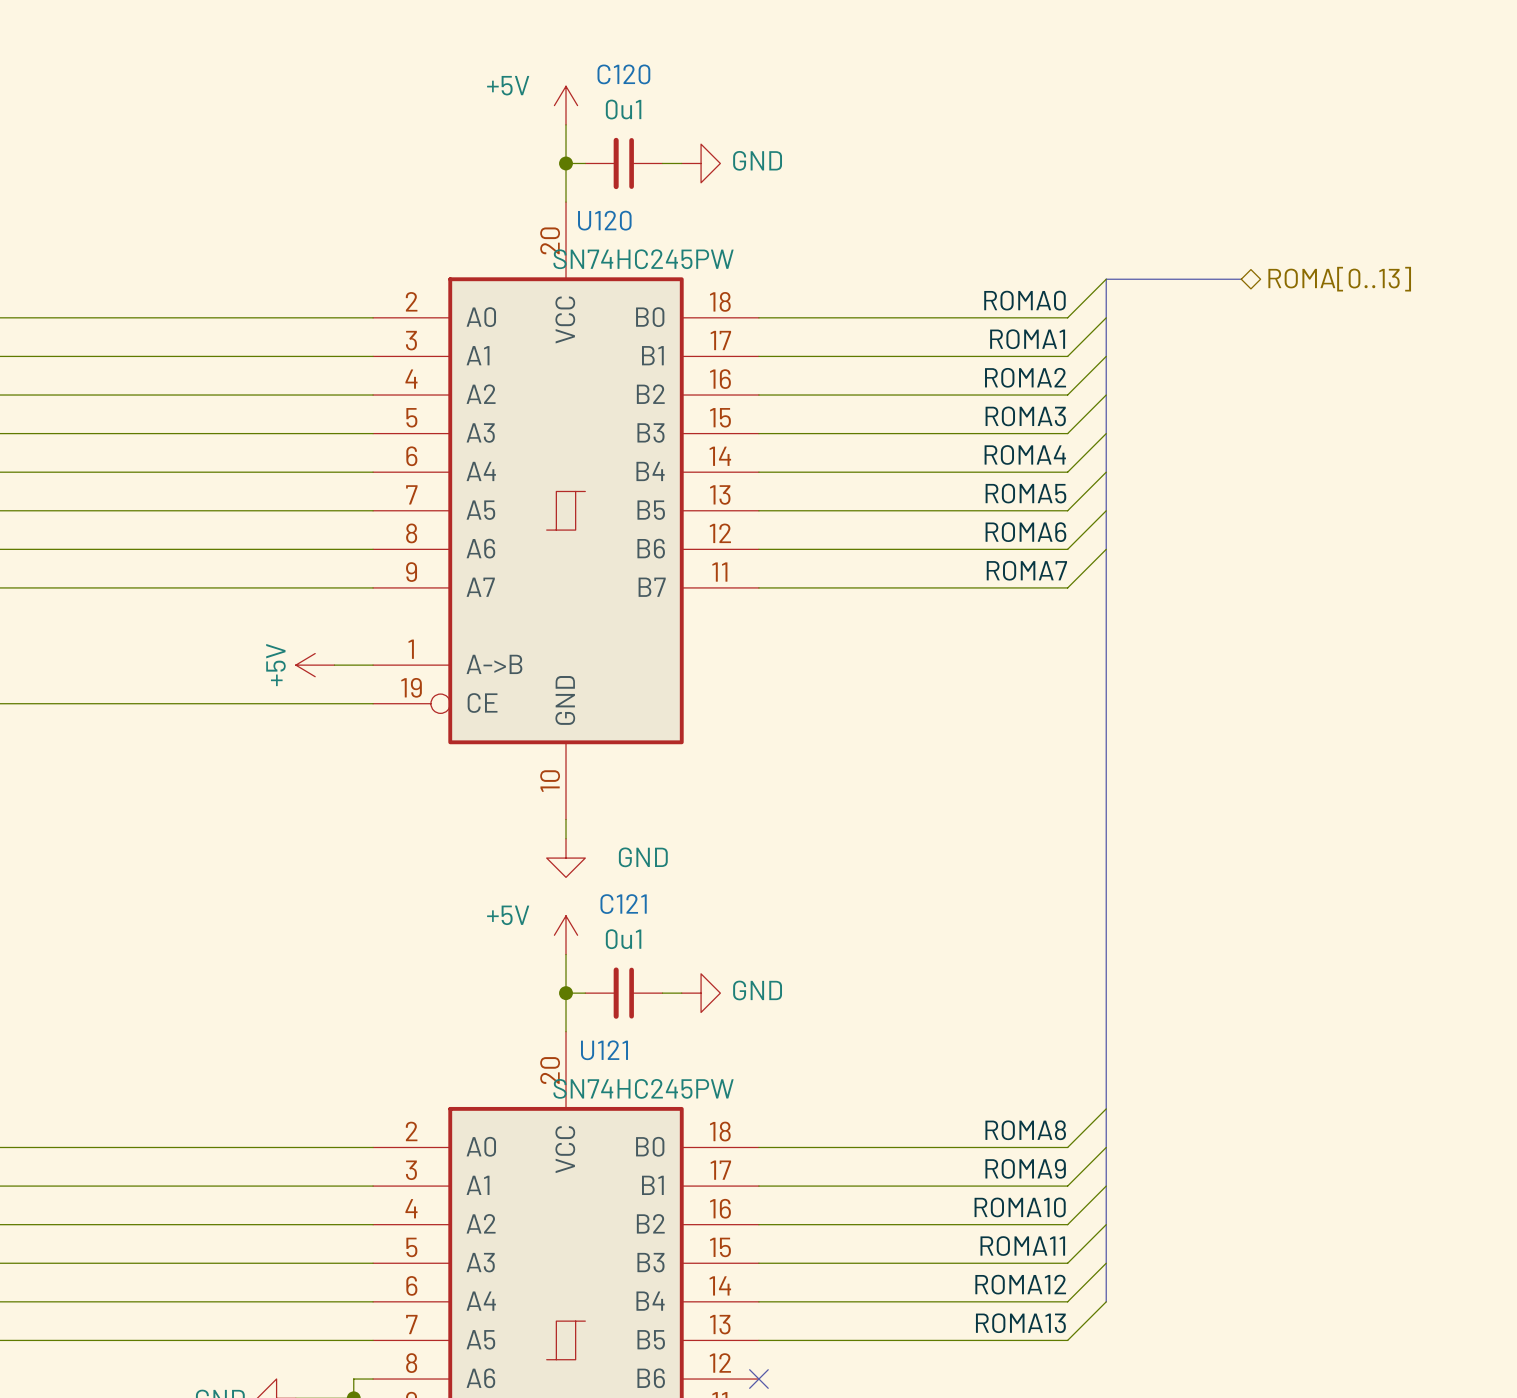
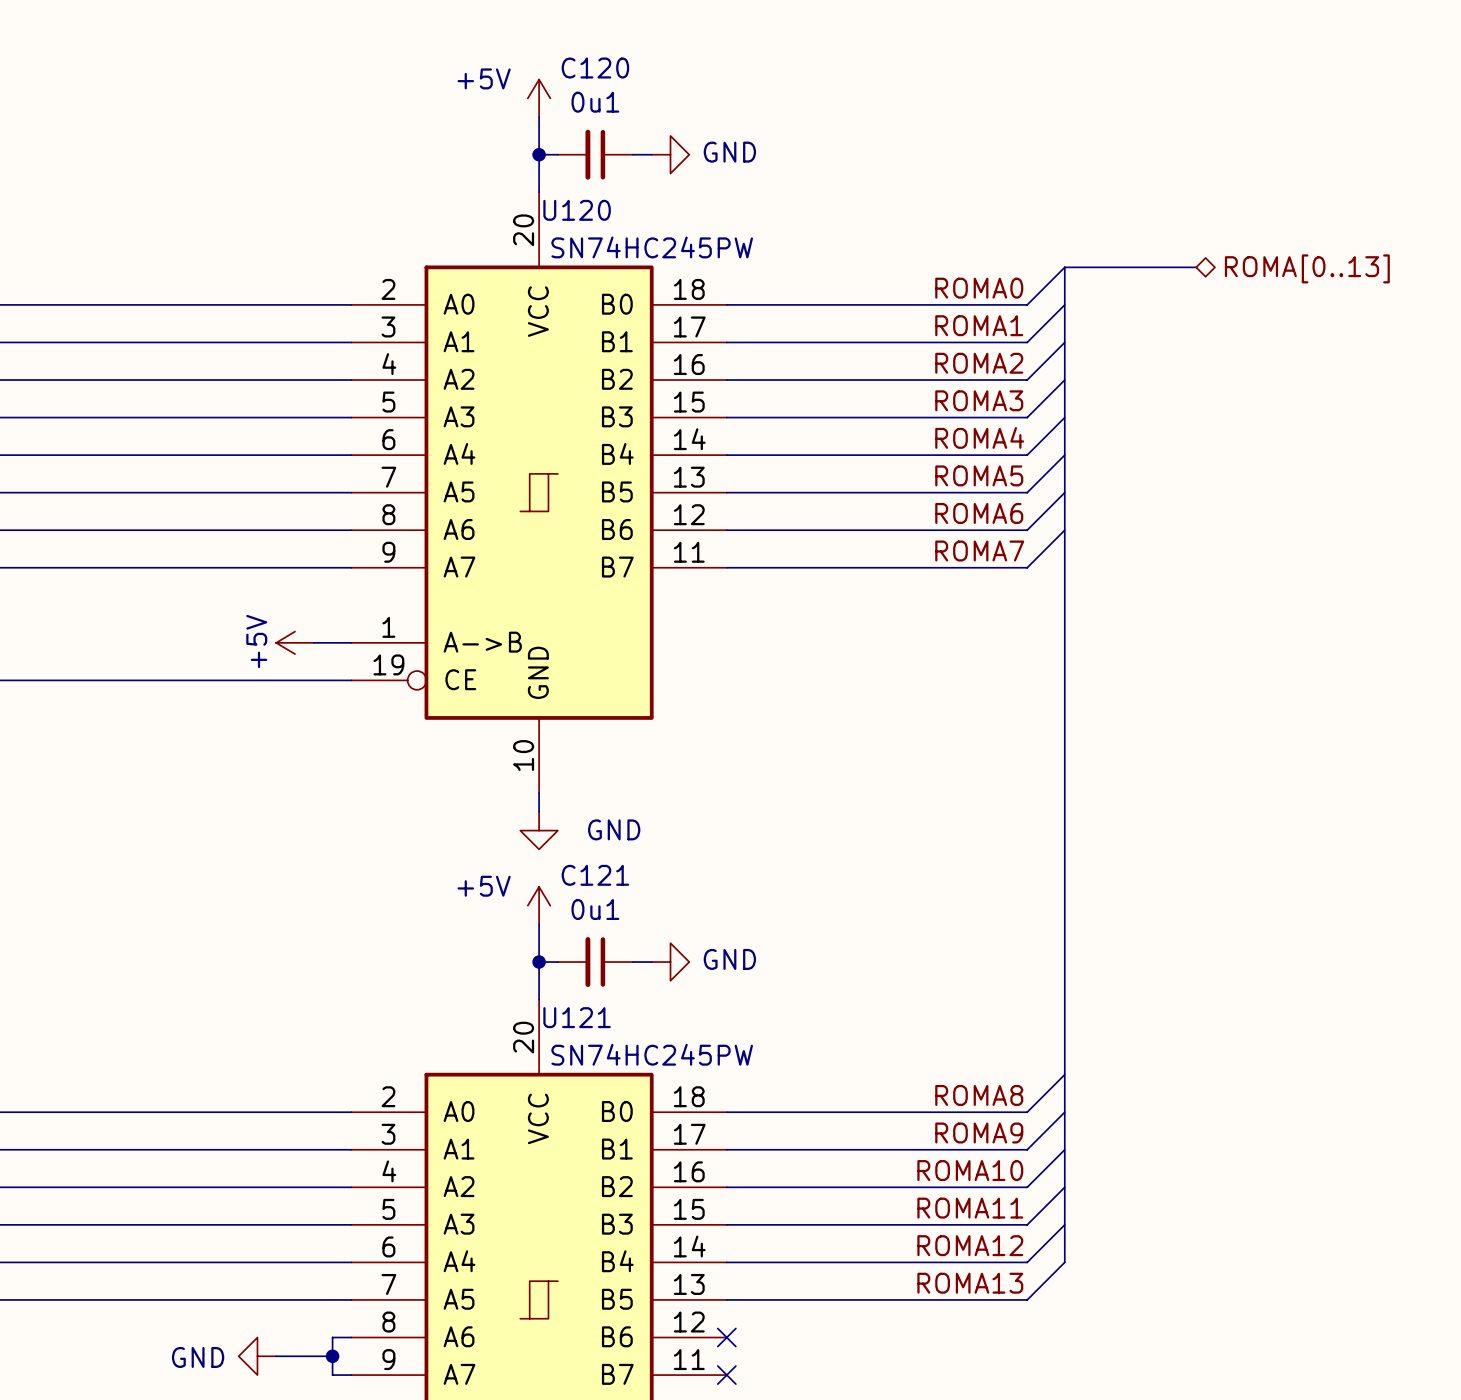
U120 value position: SN74HC245PW (643, 259) -> SN74HC245PW (652, 247)
U121 value position: SN74HC245PW (643, 1088) -> SN74HC245PW (652, 1054)

